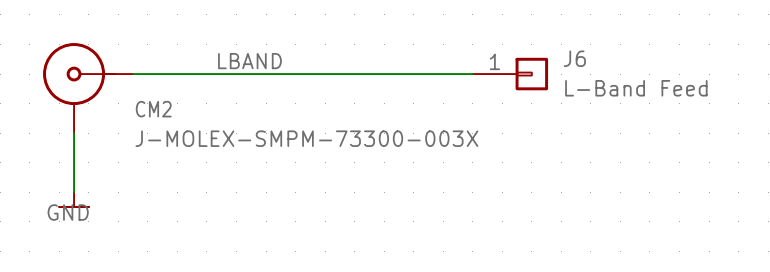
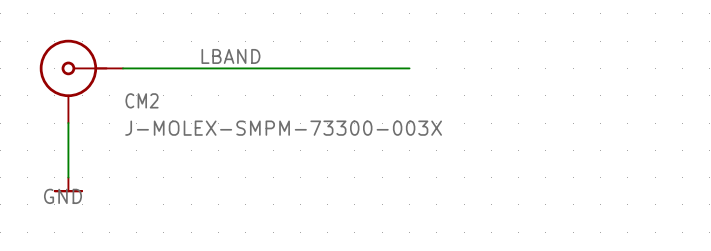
wire: (443, 74) (472, 74) -> none
J6: L-Band Feed (510, 74) -> none

